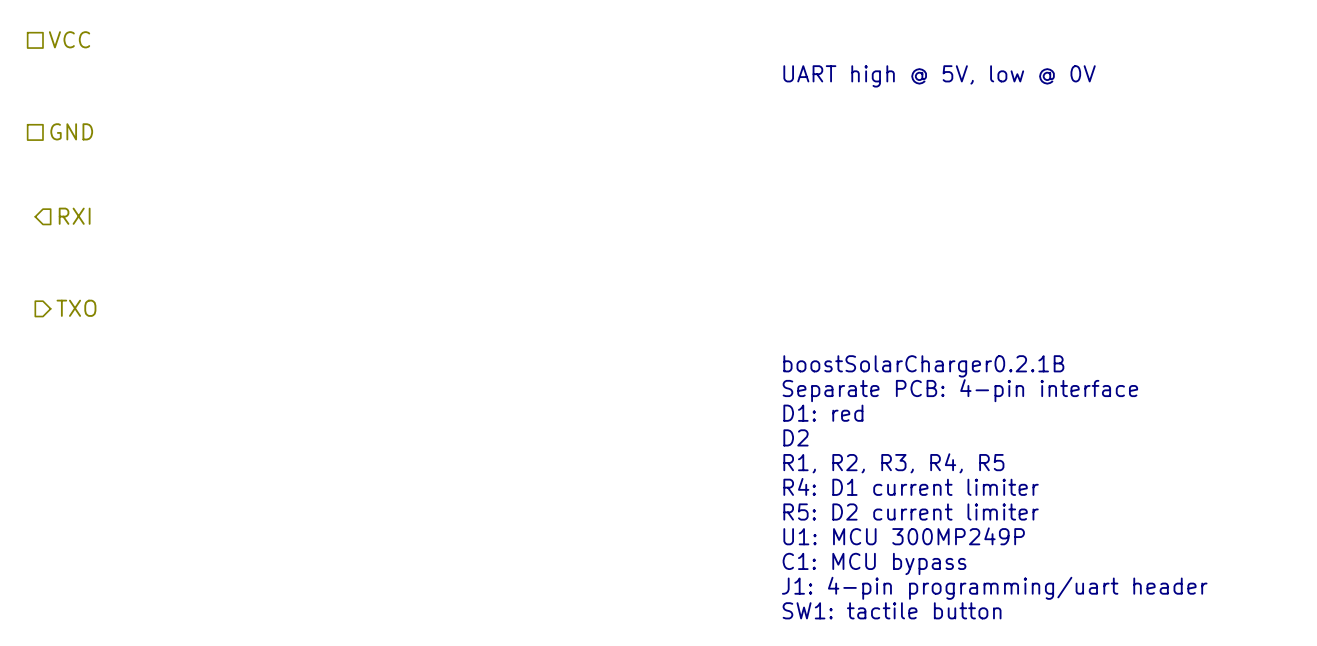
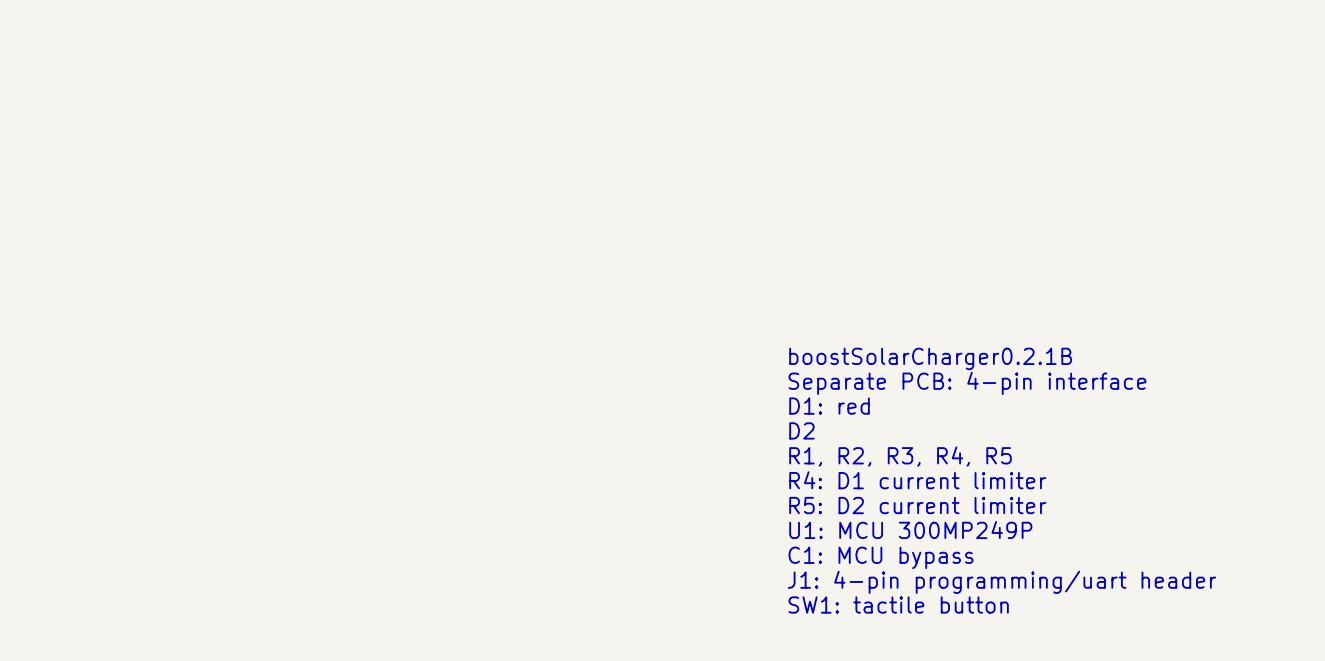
hierarchical label: VCC (69, 39) -> none
text: UART high @ 5V, low @ 0V (939, 76) -> none
hierarchical label: GND (71, 131) -> none
hierarchical label: RXI (74, 216) -> none
hierarchical label: TXO (76, 308) -> none

